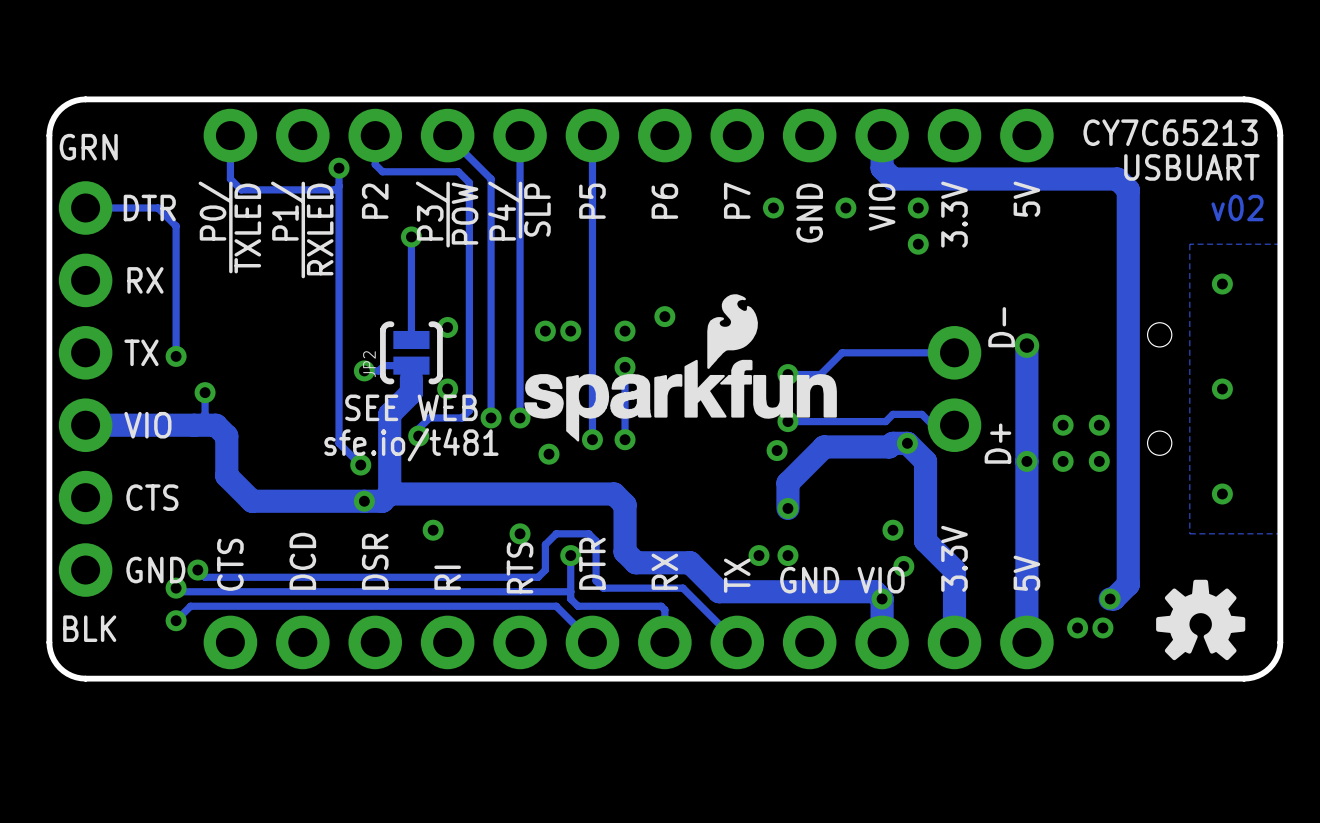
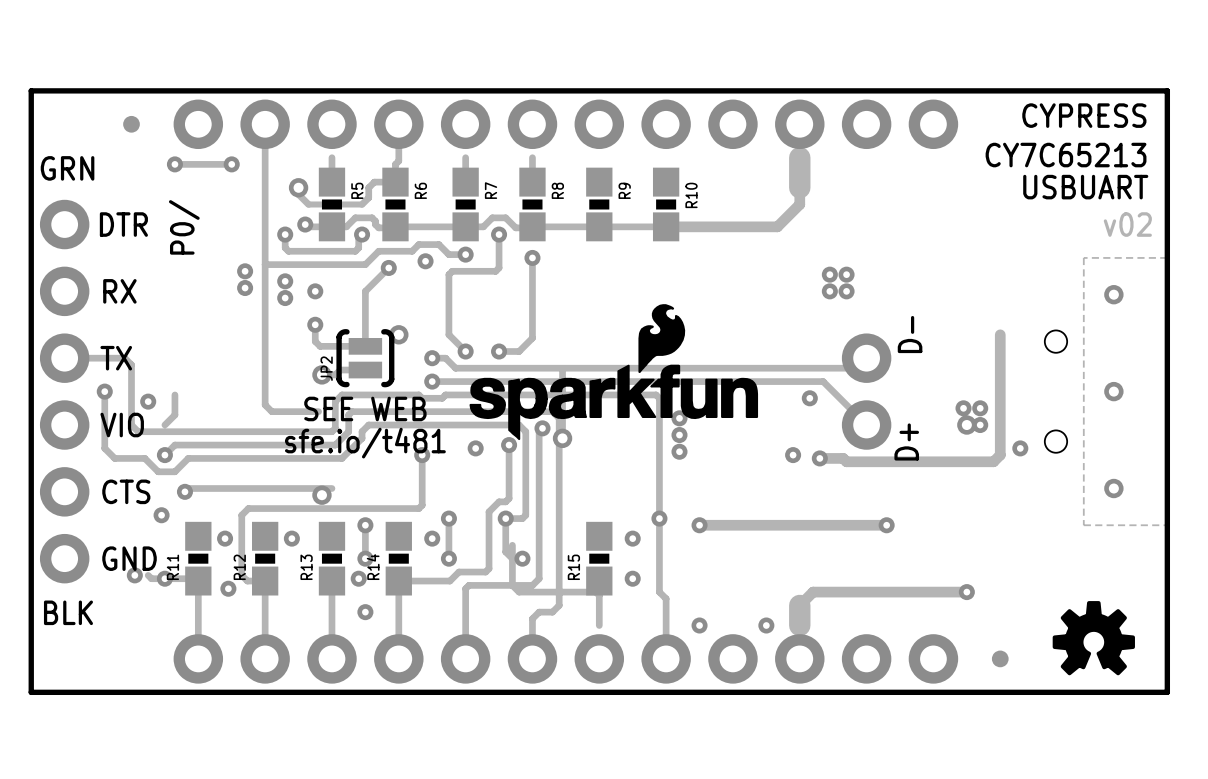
text: none -> CYPRESS (1084, 115)
part: none -> (131, 124)
track: none -> (265, 124) (265, 404) (271, 411) (318, 411)
track: (230, 135) (230, 179) (241, 189) (335, 189) (339, 186) -> none
track: (447, 135) (491, 179) (491, 417) -> none
part position: (628, 135) -> (565, 124)
board edge: (1280, 135) (1277, 121) (1269, 109) (1257, 102) (1244, 99) (85, 99) (71, 102) (60, 109) (52, 121) (49, 135) -> (1167, 157) (1167, 90) (31, 90) (31, 157)
via: none -> (174, 164)
track: none -> (231, 164) (174, 164)
via: none -> (231, 164)
track: (375, 162) (382, 171) (458, 171) (469, 182) (469, 410) (462, 417) (429, 417) (418, 428) (418, 436) -> none
track: (520, 162) (520, 417) -> none
track: (592, 162) (592, 244) -> none
track: (882, 168) (892, 179) (1117, 179) (1128, 189) (1128, 584) (1113, 599) (1110, 599) -> (799, 187) (799, 204) (777, 226) (515, 227) (505, 217) (492, 217) (483, 226) (378, 227) (372, 217) (355, 217) (346, 226) (307, 226) (305, 224)
track: (339, 175) (339, 443) (360, 465) -> (298, 194) (308, 204) (362, 204) (368, 197) (368, 187) (374, 182) (395, 182) (395, 164) (398, 161) (398, 124)
R5: none -> (331, 204)
R6: none -> (395, 204)
R7: none -> (465, 204)
R8: none -> (532, 204)
R9: none -> (599, 204)
R10: none -> (666, 204)
text: 5V (1026, 199) -> none
text: P7 (737, 200) -> none
text: P2 (375, 201) -> none
text: P5 (592, 201) -> none
text: P6 (664, 201) -> none
track: (85, 207) (158, 207) (176, 226) (176, 356) -> none
via: none -> (305, 224)
via: (773, 207) -> none
via: (845, 207) -> none
text: VIO (882, 207) -> none
via: (918, 207) -> none
text: ~{SLP} (534, 210) -> none
text: P1/ (287, 211) -> none
text: P3/ (432, 211) -> none
text: P4/ (504, 211) -> none
text: GND (809, 213) -> none
text: ~{POW} (462, 214) -> none
text: 3.3V (954, 214) -> none
via: none -> (285, 234)
track: none -> (362, 234) (358, 237) (358, 247) (355, 251) (288, 251) (285, 247) (285, 234)
track: none -> (499, 234) (499, 267) (495, 271) (452, 271) (448, 274) (448, 334) (465, 351)
via: none -> (499, 234)
text: ~{TXLED} (245, 227) -> none
text: ~{RXLED} (317, 229) -> none
track: (411, 236) (411, 280) -> (388, 267) (365, 291)
via position: (411, 236) -> (362, 234)
track: none -> (465, 254) (448, 254) (438, 244) (418, 244) (412, 251) (378, 251) (365, 264) (265, 264)
via: none -> (465, 254)
via: none -> (532, 257)
via: (918, 244) -> none
via: none -> (425, 261)
via: none -> (388, 267)
via: none -> (245, 271)
via: none -> (829, 274)
via: none -> (846, 274)
via: none -> (285, 281)
via: none -> (245, 288)
via: none -> (315, 291)
via: none -> (829, 291)
via: none -> (846, 291)
via: none -> (285, 298)
track: none -> (315, 324) (315, 341) (320, 346) (365, 346)
via: none -> (315, 324)
via: (664, 316) -> none
track: none -> (1000, 334) (1000, 455) (993, 461) (846, 461) (843, 458) (819, 458)
via: (545, 331) -> none
via: (570, 331) -> none
track: (592, 331) (592, 439) -> (532, 338) (519, 351) (499, 351)
via: (625, 331) -> none
via: none -> (465, 351)
via: none -> (499, 351)
track: (1026, 345) (1026, 642) -> none
via: (1026, 345) -> none
track: none -> (64, 358) (124, 358) (131, 364) (131, 425) (138, 431) (331, 431) (335, 428) (335, 401) (342, 394) (418, 394) (422, 398) (442, 398) (445, 394) (656, 394) (659, 398) (659, 592) (666, 598) (666, 658)
via: none -> (432, 358)
track: (954, 352) (842, 352) (820, 374) (787, 374) -> (866, 358) (856, 368) (455, 368) (445, 358) (432, 358)
via: (176, 356) -> none
track: (411, 365) (411, 392) (389, 414) (389, 494) -> none
via: (625, 367) -> none
via: (787, 374) -> none
via: none -> (432, 381)
track: none -> (104, 391) (104, 448) (114, 458) (144, 458) (158, 471) (174, 471) (188, 458) (342, 458) (362, 438) (362, 431) (368, 425) (519, 425) (525, 431) (525, 515) (522, 518) (505, 518) (505, 551) (512, 558) (522, 558)
via: none -> (104, 391)
via: (447, 389) -> none
via: (205, 392) -> none
via: none -> (809, 398)
via: none -> (148, 401)
via: none -> (963, 408)
via: none -> (980, 408)
via: (491, 417) -> none
via: (520, 417) -> none
via: none -> (679, 418)
track: (787, 421) (885, 421) (892, 414) (921, 414) (932, 425) (954, 425) -> (432, 381) (823, 381) (866, 425)
via: (787, 421) -> none
track: (85, 425) (215, 425) (226, 436) (226, 475) (252, 501) (382, 501) (389, 494) -> none
via: none -> (980, 425)
via: (1099, 425) -> none
track: none -> (542, 428) (539, 431) (539, 578) (532, 585) (468, 585) (465, 588) (465, 658)
via: (418, 436) -> none
via: none -> (679, 435)
via position: (592, 439) -> (542, 428)
via position: (907, 443) -> (819, 458)
via: none -> (509, 445)
via: none -> (475, 448)
via: (777, 450) -> none
via: none -> (1020, 448)
via: (549, 454) -> none
via: none -> (679, 451)
track: none -> (164, 455) (174, 445) (335, 445) (348, 431) (348, 414) (352, 411) (552, 411) (559, 418) (559, 605) (552, 612) (539, 612) (532, 618) (532, 658)
via: none -> (164, 455)
track: none -> (422, 455) (422, 505) (418, 508) (248, 508) (241, 515) (241, 575) (247, 581) (265, 581) (265, 658)
via: none -> (422, 455)
via: none -> (793, 455)
via: (1026, 461) -> none
via: (1063, 461) -> none
via: (1099, 461) -> none
via: (360, 465) -> none
track: none -> (331, 488) (188, 488) (184, 491)
track: (389, 494) (614, 494) (625, 504) (625, 551) (635, 562) (690, 562) (719, 591) (874, 591) (882, 599) (882, 620) -> (966, 592) (813, 592) (799, 605)
via: none -> (184, 491)
track: (787, 508) (787, 483) (824, 446) (889, 446) (892, 443) (907, 443) (925, 461) (925, 541) (954, 570) (954, 642) -> none
via: (787, 508) -> none
via: none -> (161, 515)
track: none -> (448, 518) (448, 558)
via: none -> (505, 518)
via: none -> (659, 518)
via: (433, 530) -> none
via: (892, 530) -> none
track: none -> (365, 525) (365, 558)
via: none -> (365, 525)
via position: (520, 533) -> (448, 518)
via: none -> (699, 525)
track: none -> (886, 525) (699, 525)
via: none -> (886, 525)
track: (545, 544) (556, 533) (588, 533) (596, 541) (596, 580) (603, 588) (682, 588) (737, 642) -> (489, 535) (489, 511) (499, 501) (505, 501) (509, 498) (509, 445)
via: none -> (225, 538)
via: none -> (291, 538)
via: none -> (432, 538)
via: none -> (632, 538)
via position: (570, 555) -> (522, 558)
via: (758, 555) -> none
via: (787, 555) -> none
text: 3.3V (954, 558) -> none
text: DCD (302, 561) -> none
text: DSR (375, 561) -> none
text: DTR (592, 563) -> none
text: CTS (230, 564) -> none
via: (903, 566) -> none
text: RTS (520, 567) -> none
via: (197, 570) -> none
R11: none -> (198, 558)
R12: none -> (265, 558)
R13: none -> (331, 558)
via: none -> (365, 558)
R14: none -> (398, 558)
via: none -> (448, 558)
track: (545, 570) (538, 577) (205, 577) (197, 570) -> (489, 558) (489, 568) (485, 572) (458, 572) (449, 581) (398, 581) (398, 658)
R15: none -> (599, 558)
text: RX (664, 571) -> none
text: 5V (1026, 573) -> none
text: TX (737, 575) -> none
text: RI (447, 577) -> none
text: GND (809, 580) -> none
text: VIO (881, 580) -> none
via: none -> (134, 575)
via: (176, 588) -> none
via: none -> (164, 578)
via: none -> (358, 578)
track: (570, 591) (227, 591) -> (198, 658) (198, 581) (196, 578)
via: none -> (632, 578)
track: none -> (331, 581) (331, 658)
via: (882, 599) -> none
via: (1110, 599) -> none
via: none -> (228, 588)
via: none -> (966, 592)
drawing position: (1200, 619) -> (1093, 638)
track: (176, 620) (190, 606) (556, 606) (592, 642) -> none
via: (176, 620) -> none
via: none -> (365, 612)
via: (1077, 627) -> none
via: (1102, 627) -> none
part position: (628, 642) -> (565, 658)
via: none -> (699, 625)
via: none -> (766, 625)
board edge: (1280, 642) (1277, 656) (1269, 668) (1257, 675) (1244, 678) (85, 678) (71, 675) (60, 668) (52, 656) (49, 642) -> (1167, 625) (1167, 692) (31, 692) (31, 625)
part: none -> (1000, 658)

